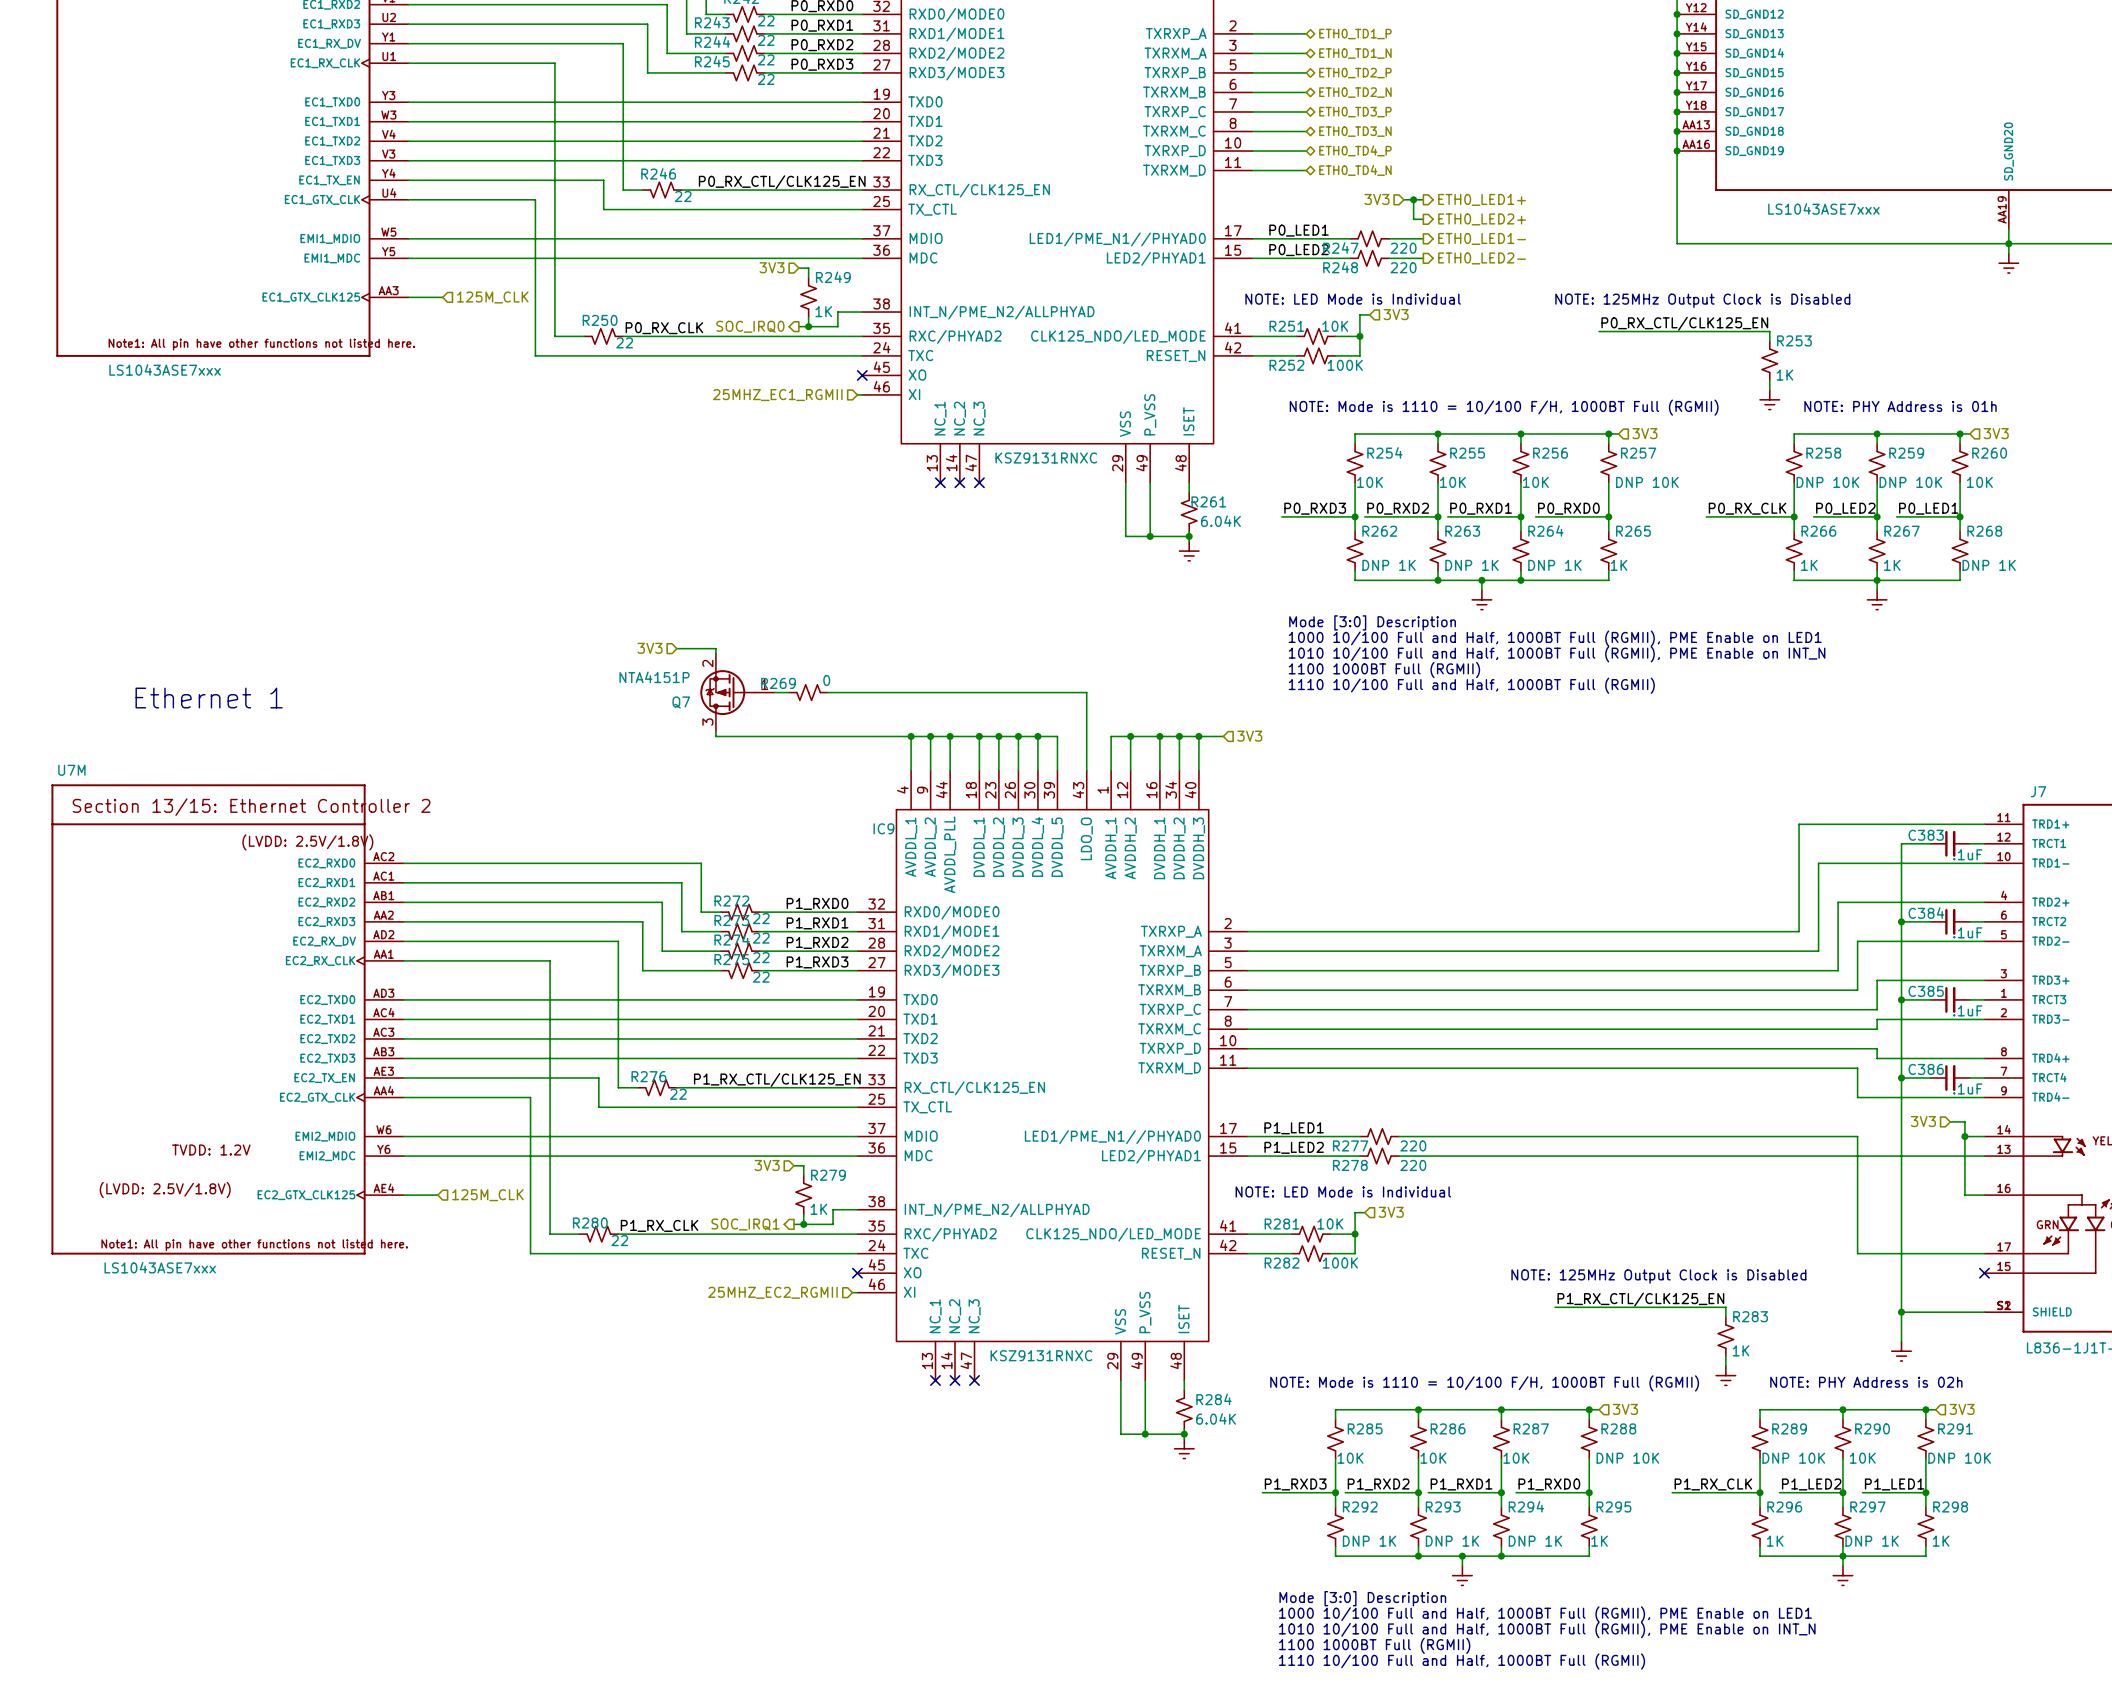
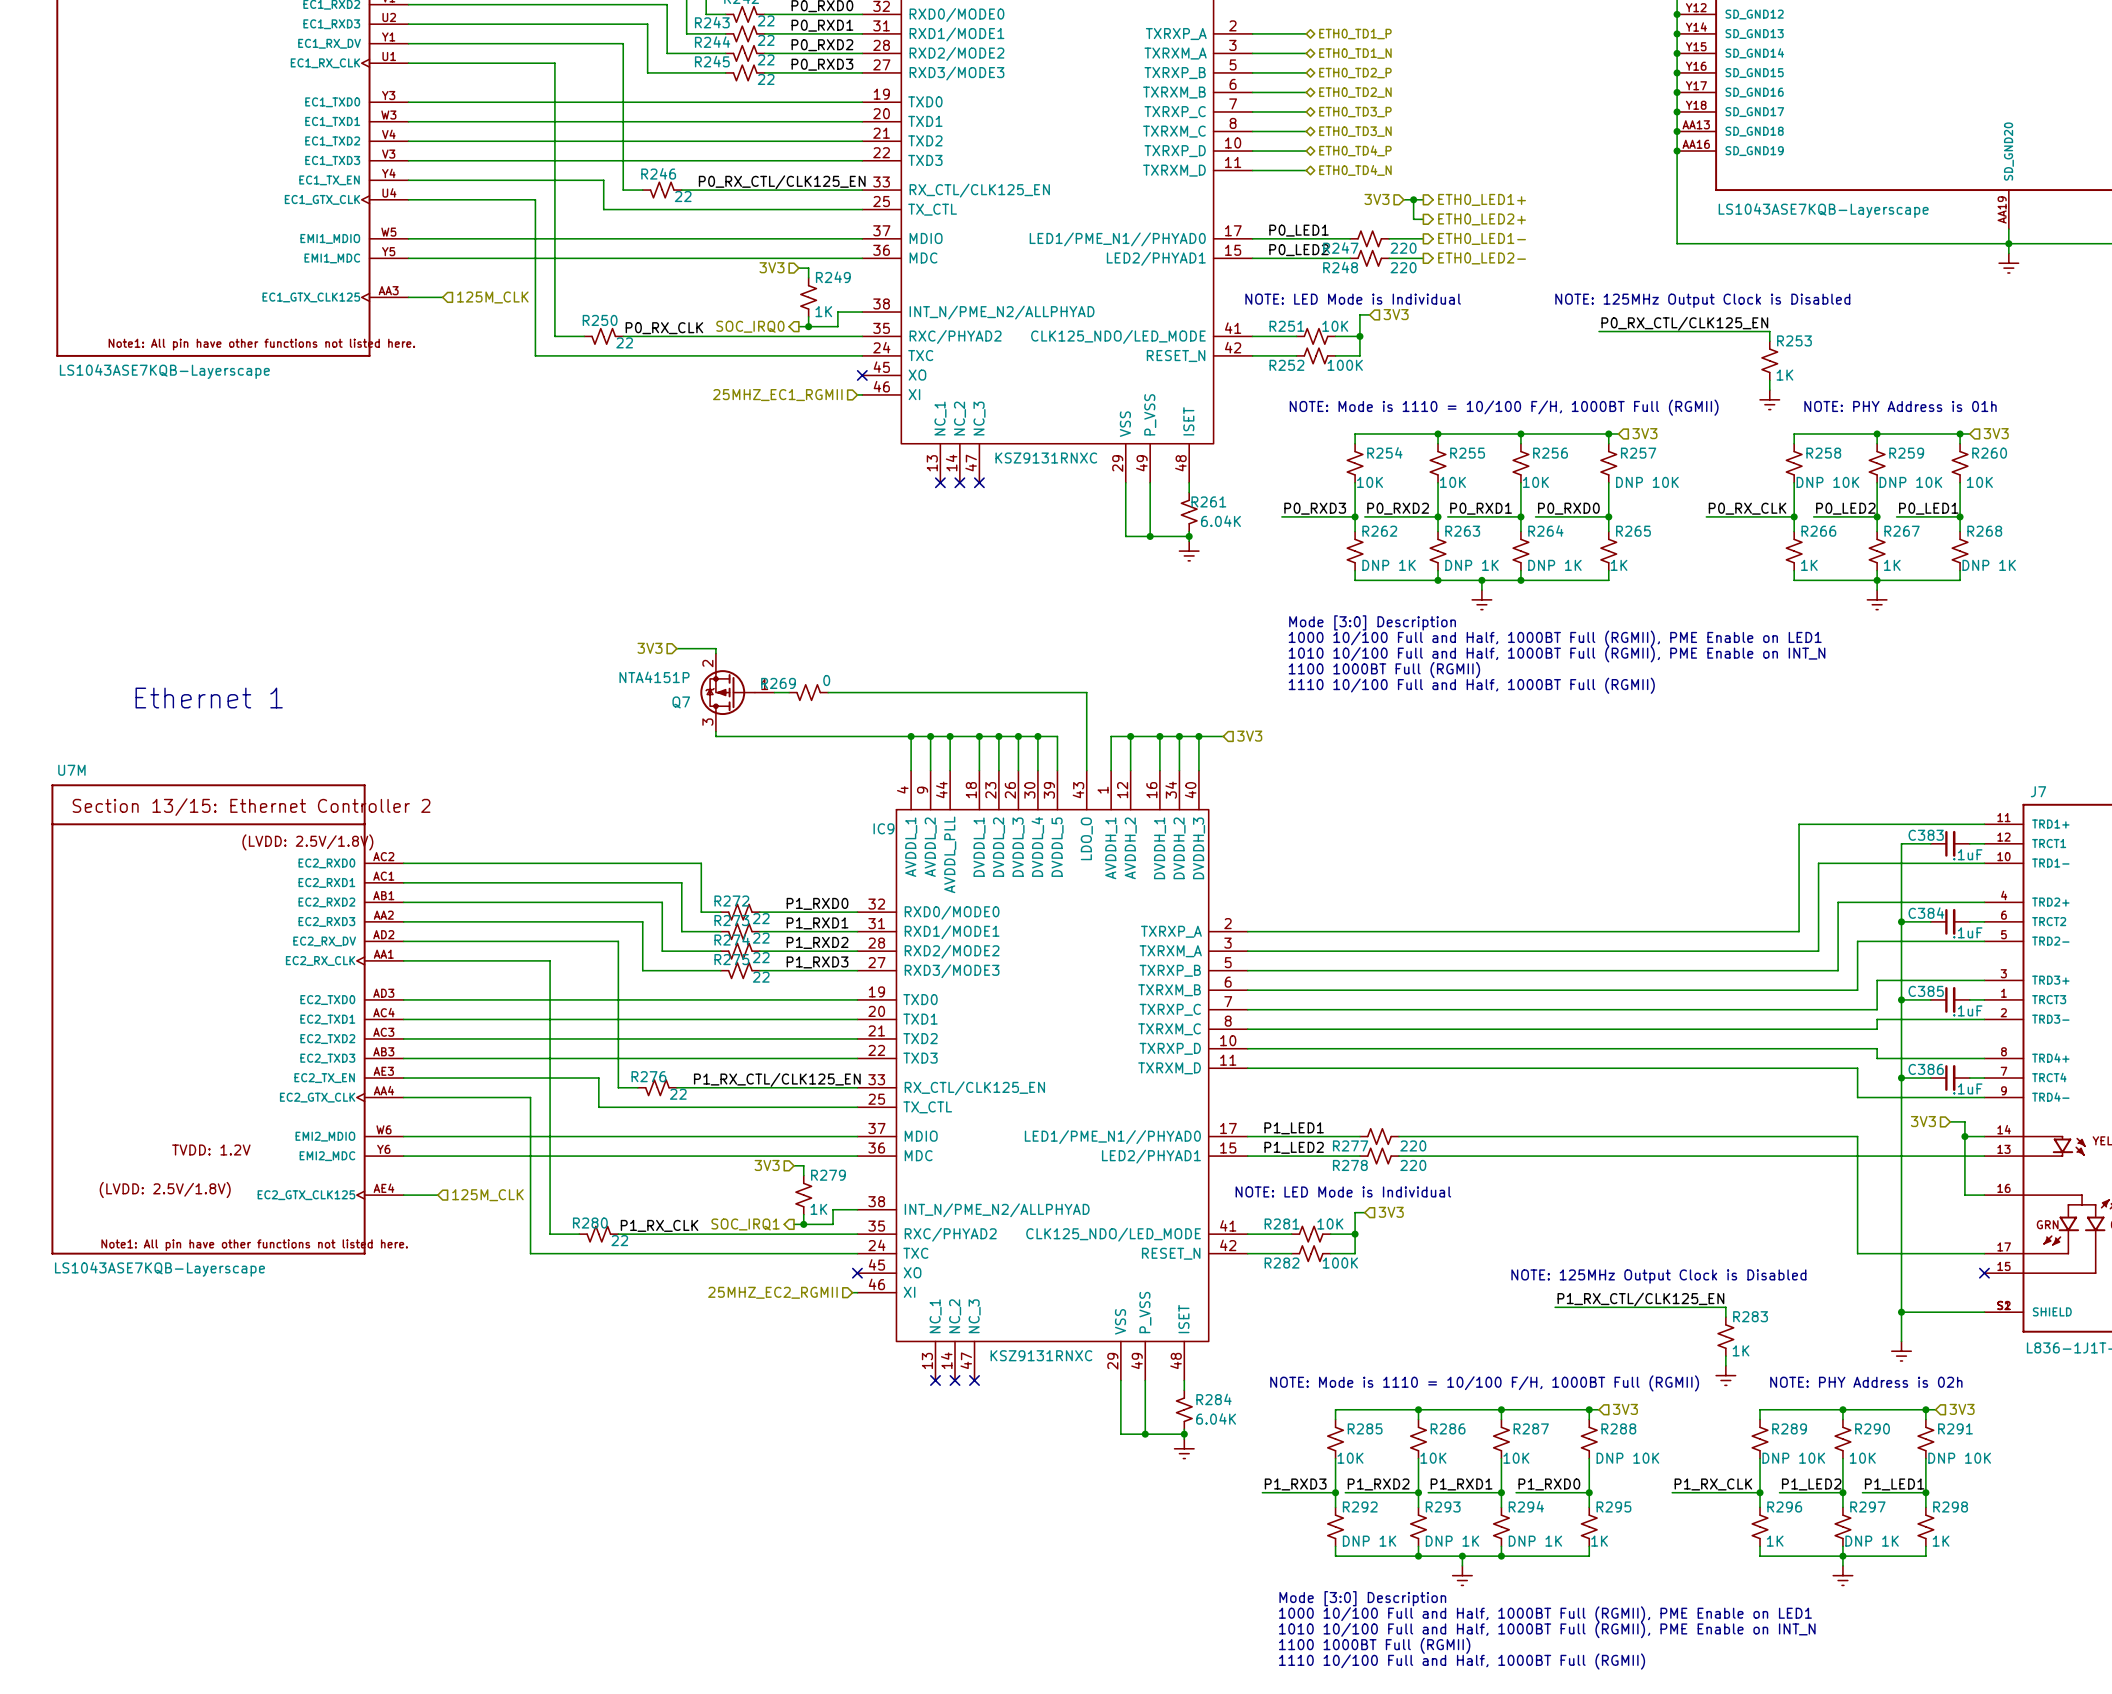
part value: LS1043ASE7xxx (1823, 208) -> LS1043ASE7KQB-Layerscape (1823, 210)
part value: LS1043ASE7xxx (165, 369) -> LS1043ASE7KQB-Layerscape (164, 371)
U7M value: LS1043ASE7xxx (160, 1267) -> LS1043ASE7KQB-Layerscape (159, 1269)

